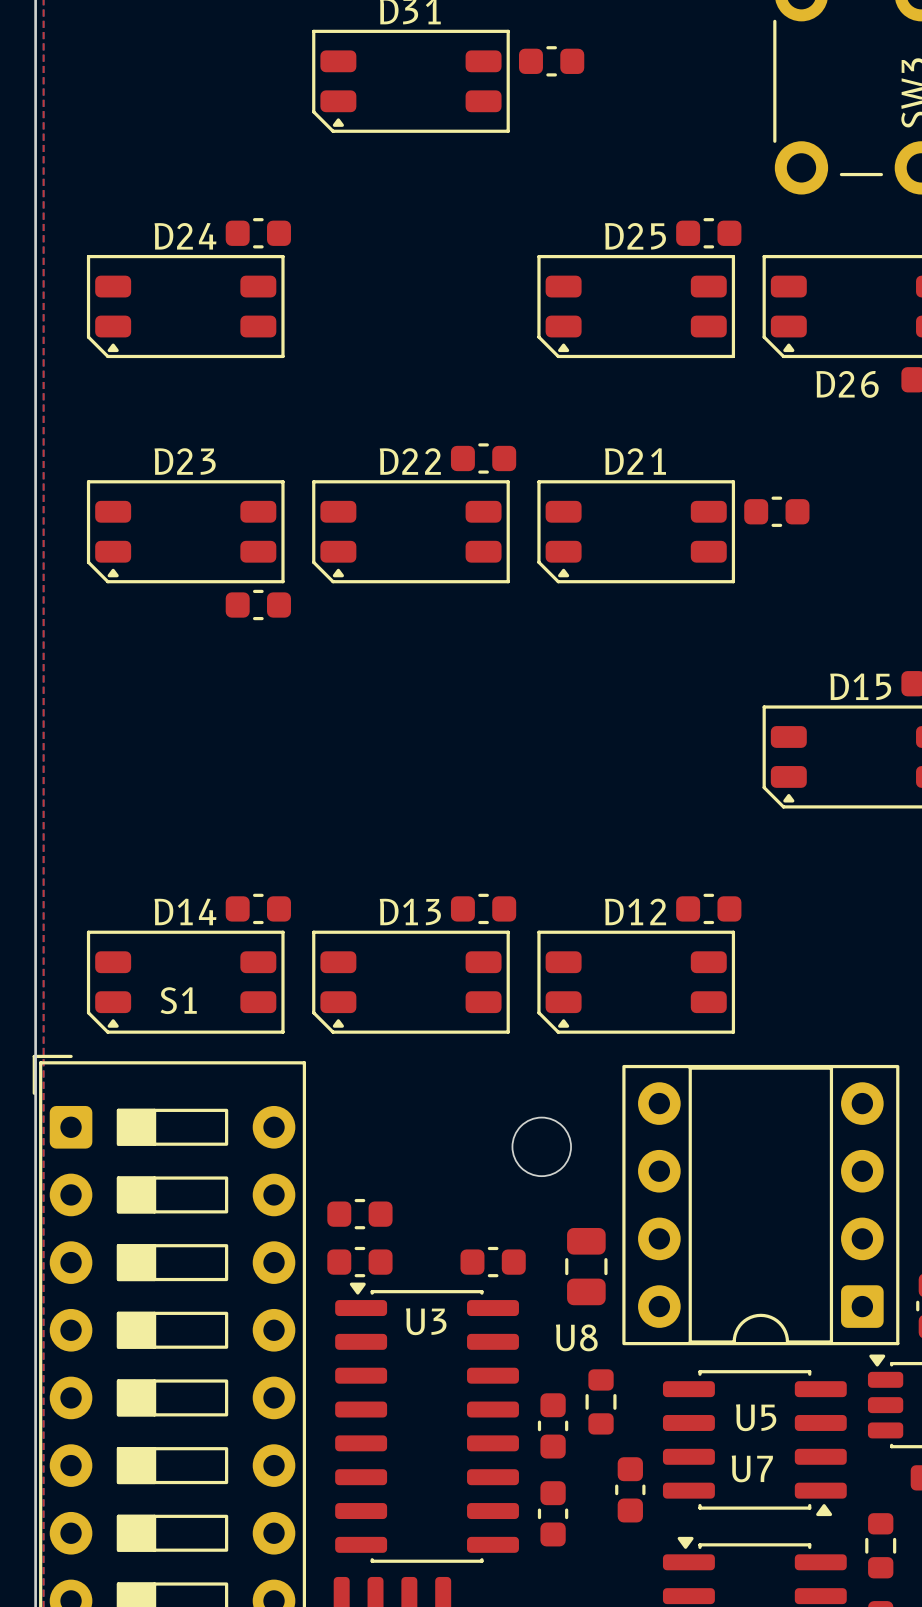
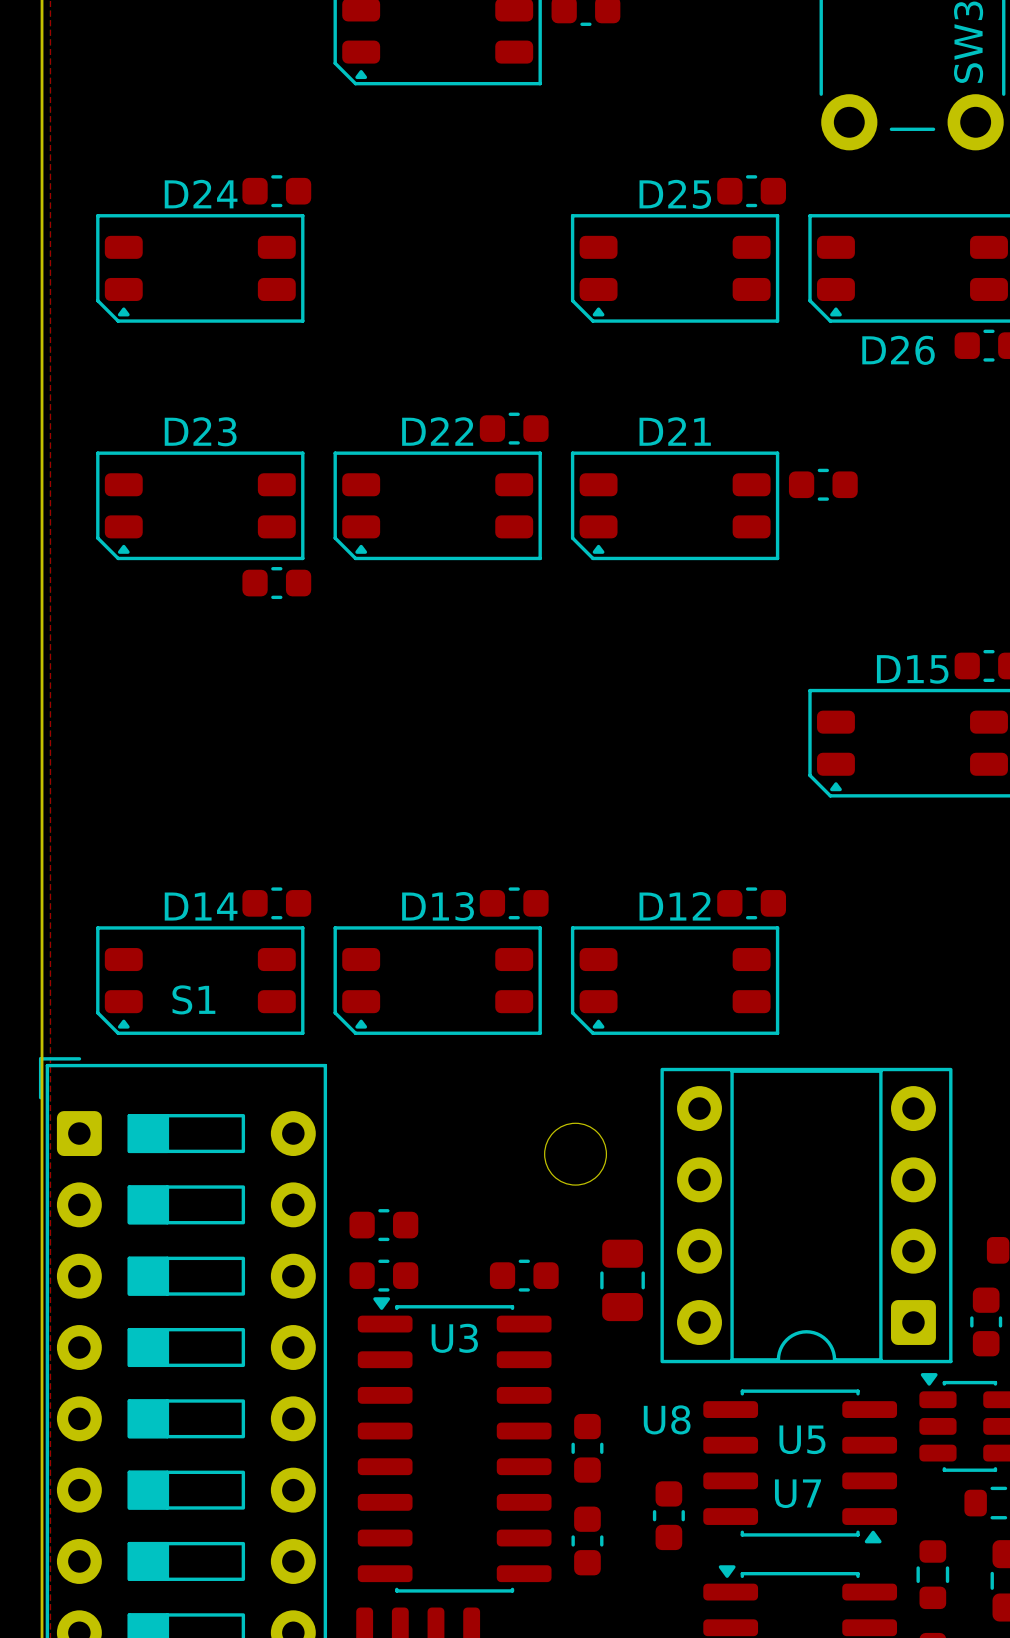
U8 name position: U8 (576, 1337) -> U8 (667, 1419)
part: (601, 1401) -> none

